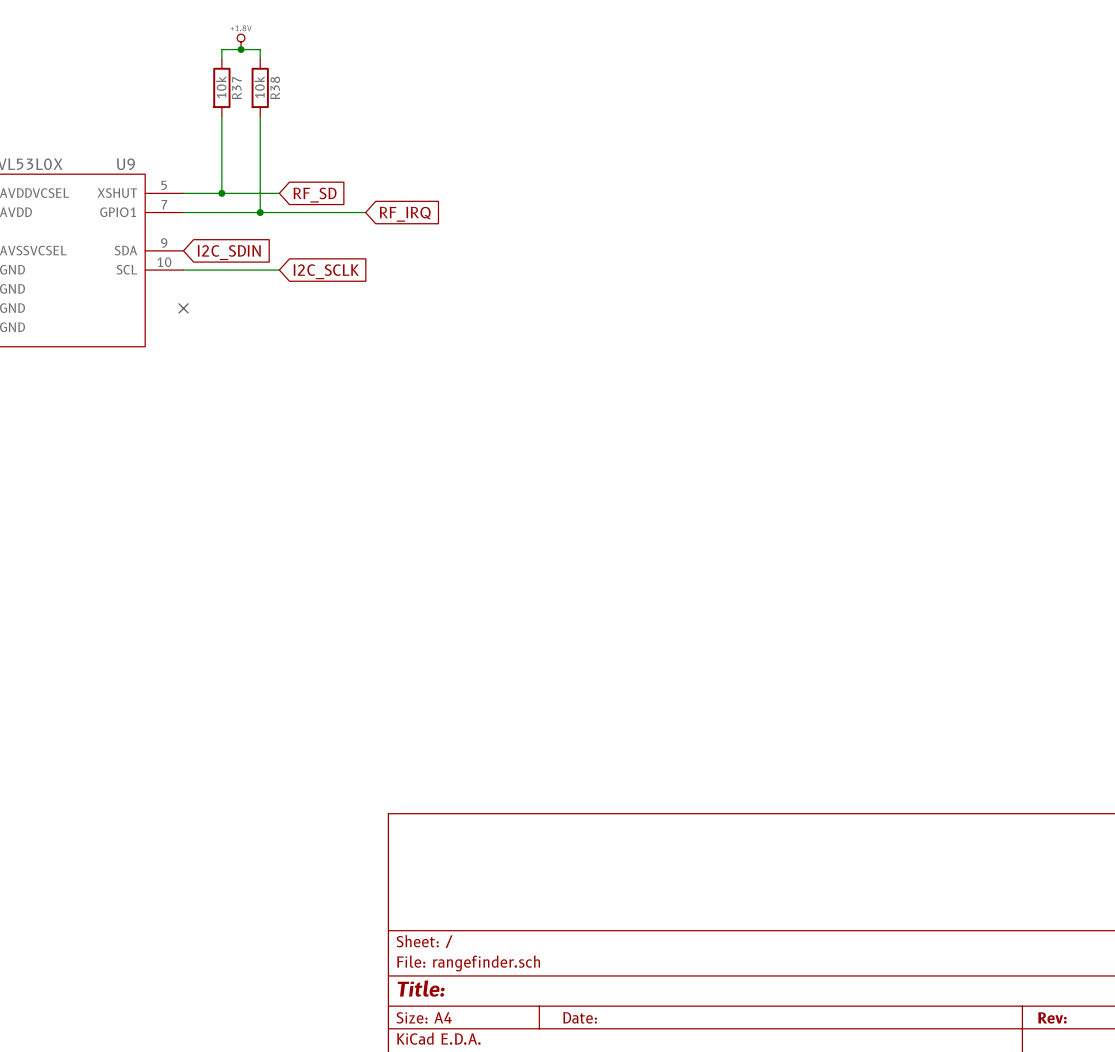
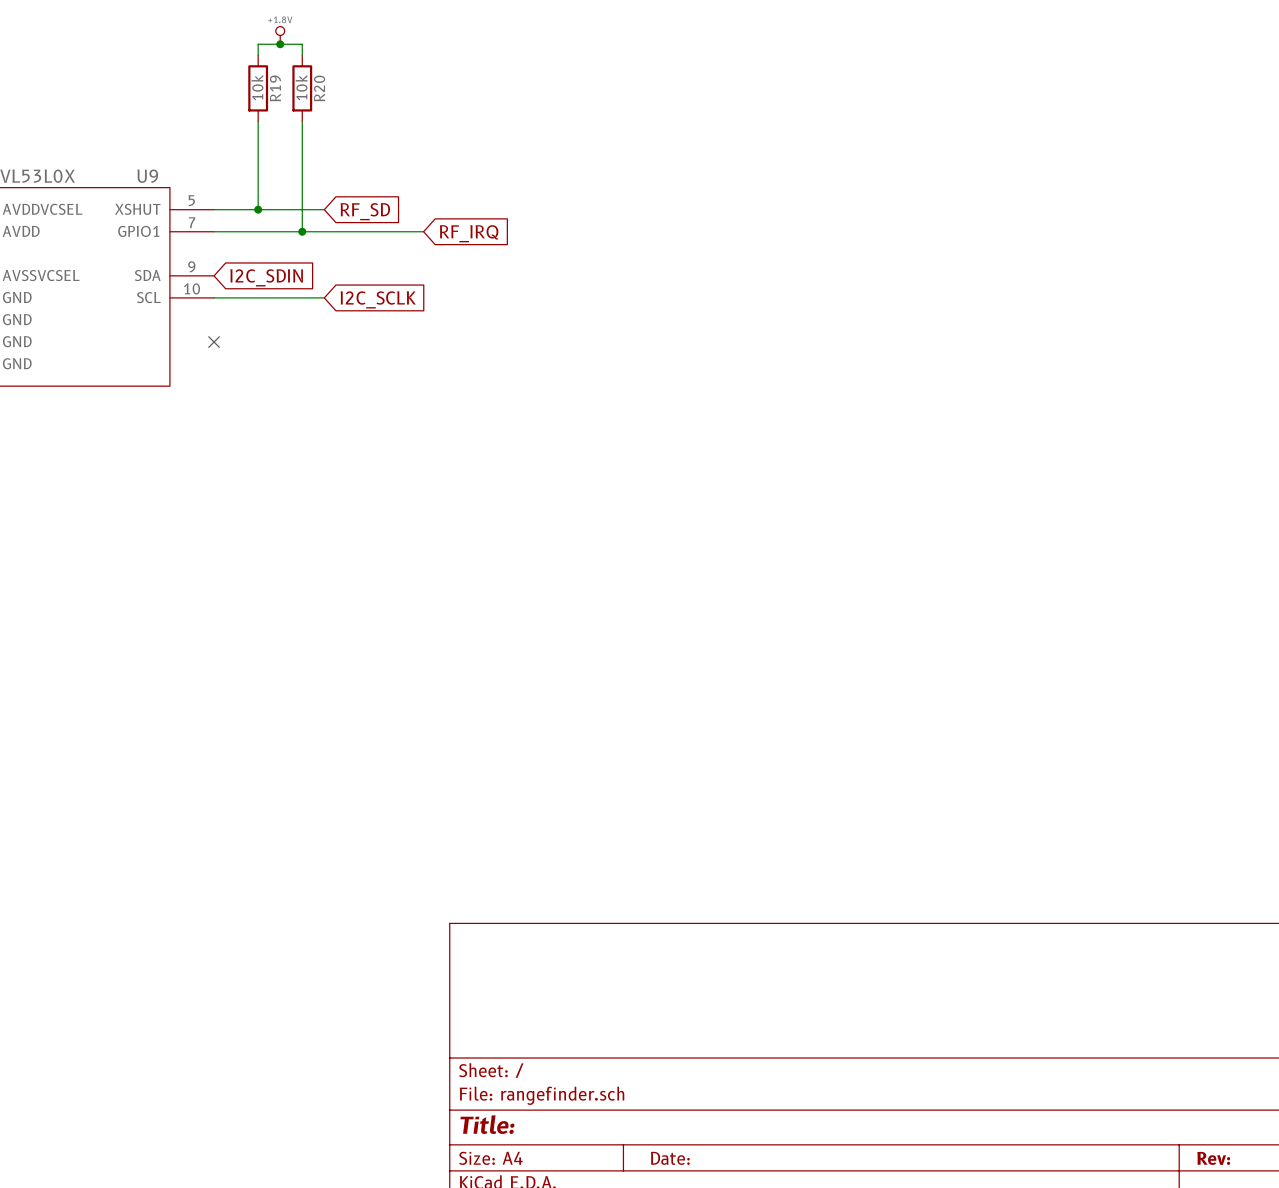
R38 name: R38 (275, 87) -> R20 (319, 88)
R37 name: R37 (236, 88) -> R19 (275, 88)

